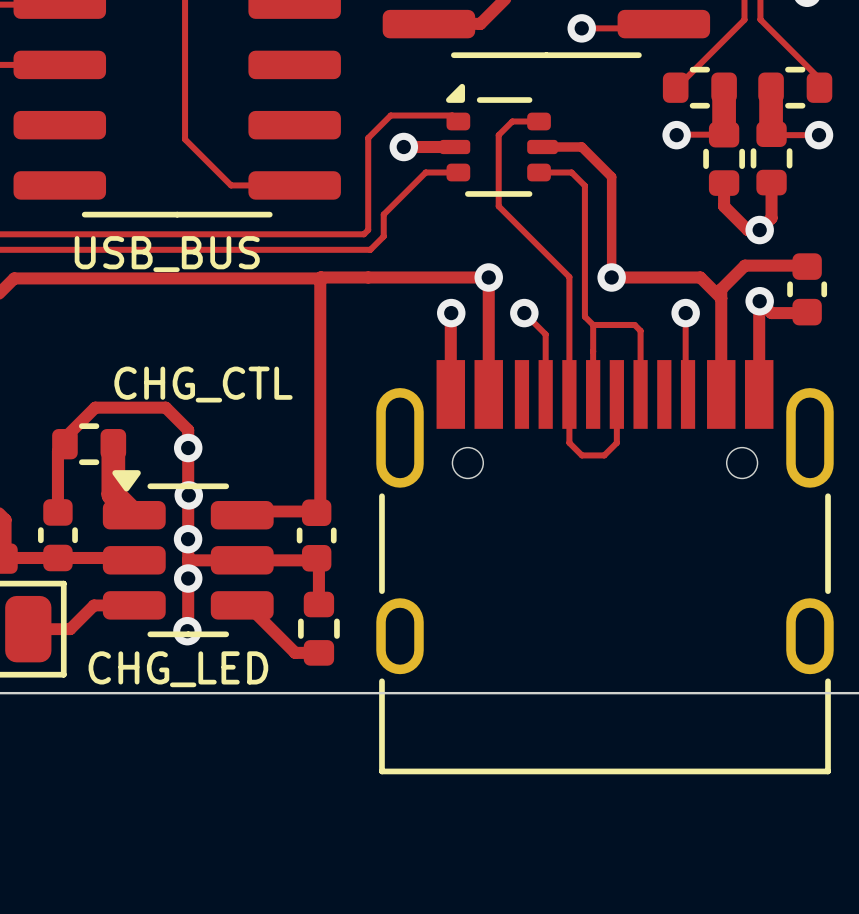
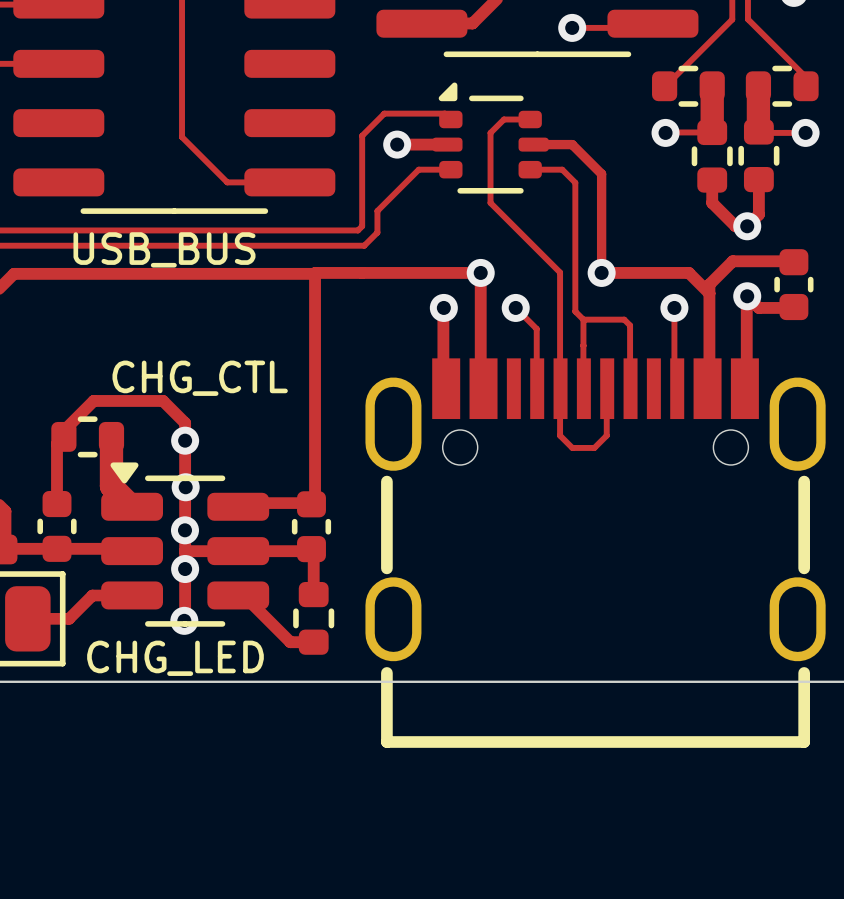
part footprint: [376, 360, 834, 775] -> [365, 358, 826, 748]

